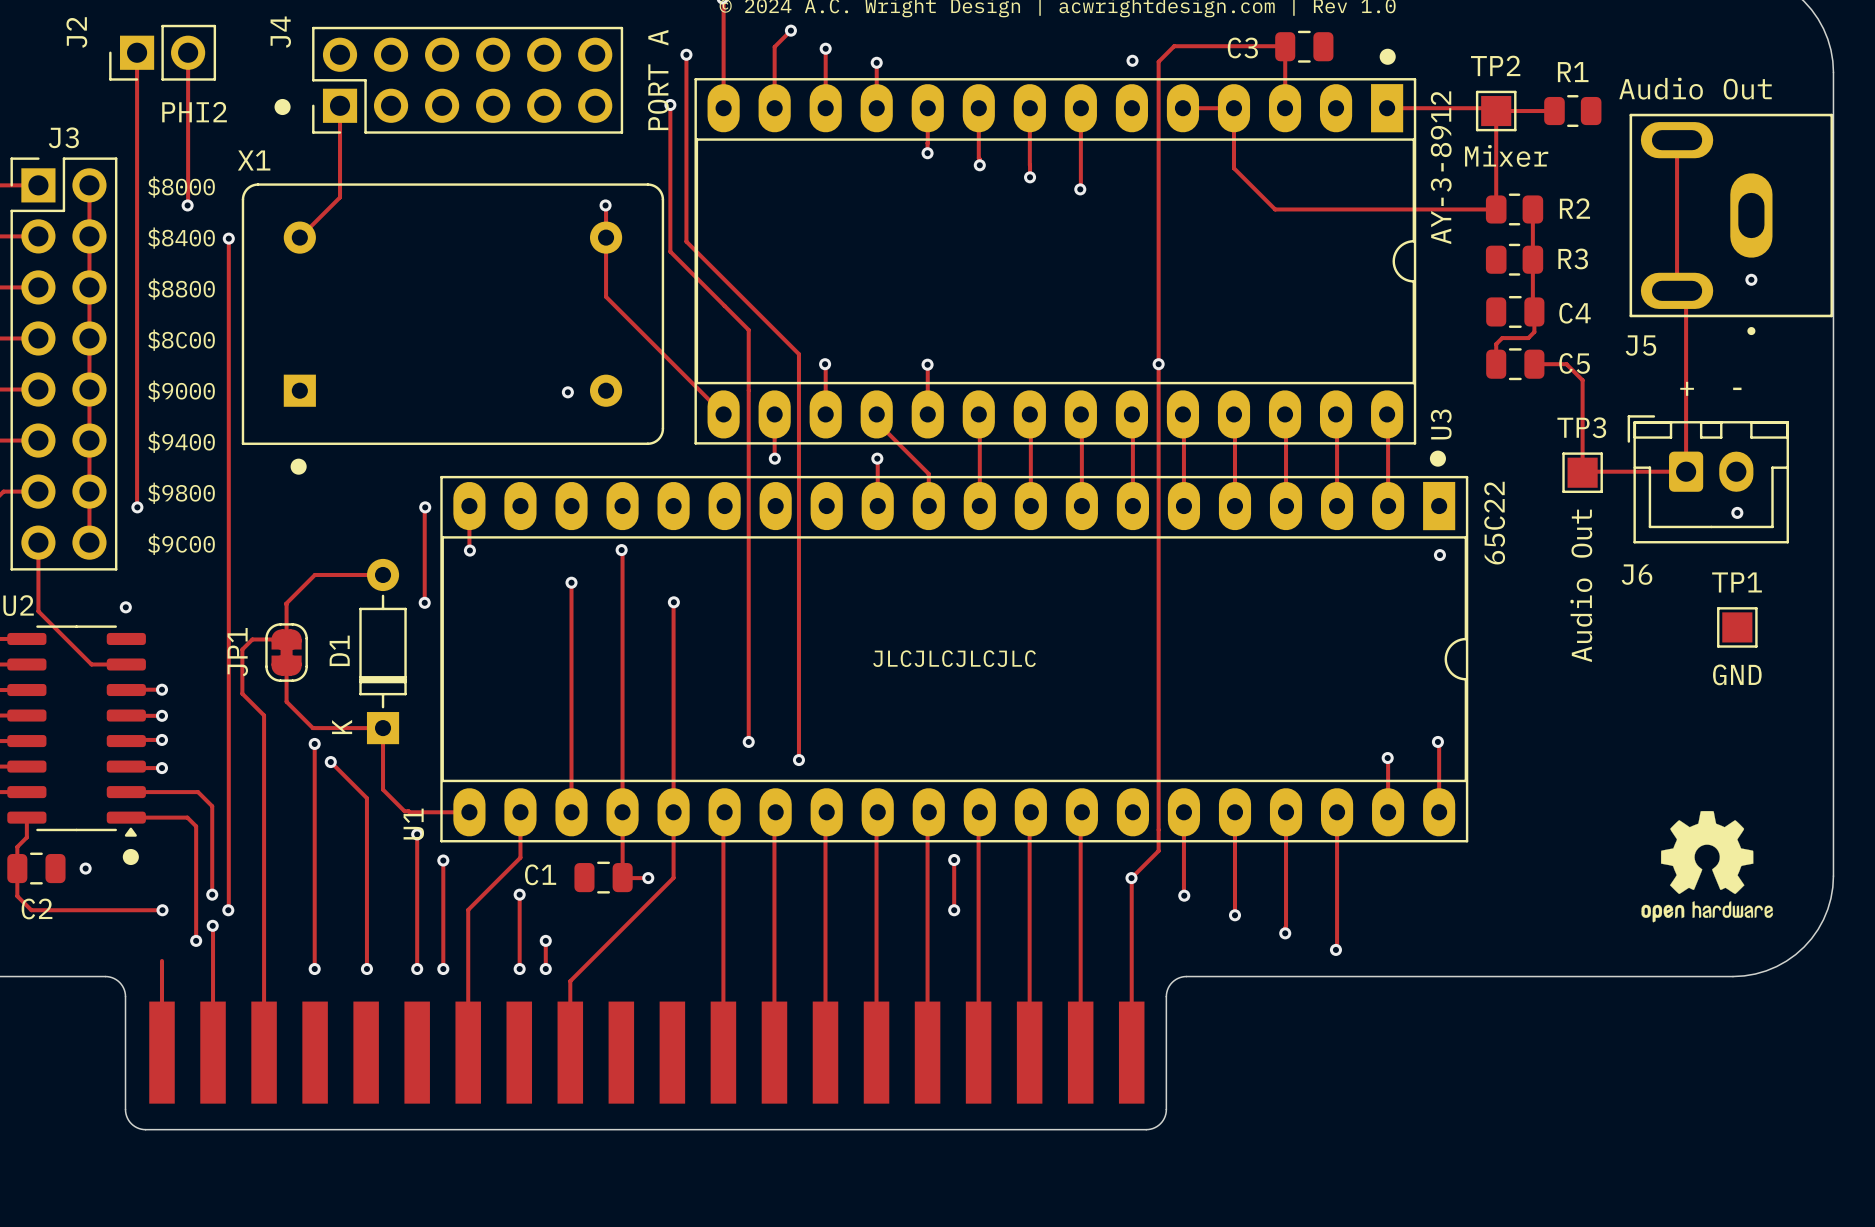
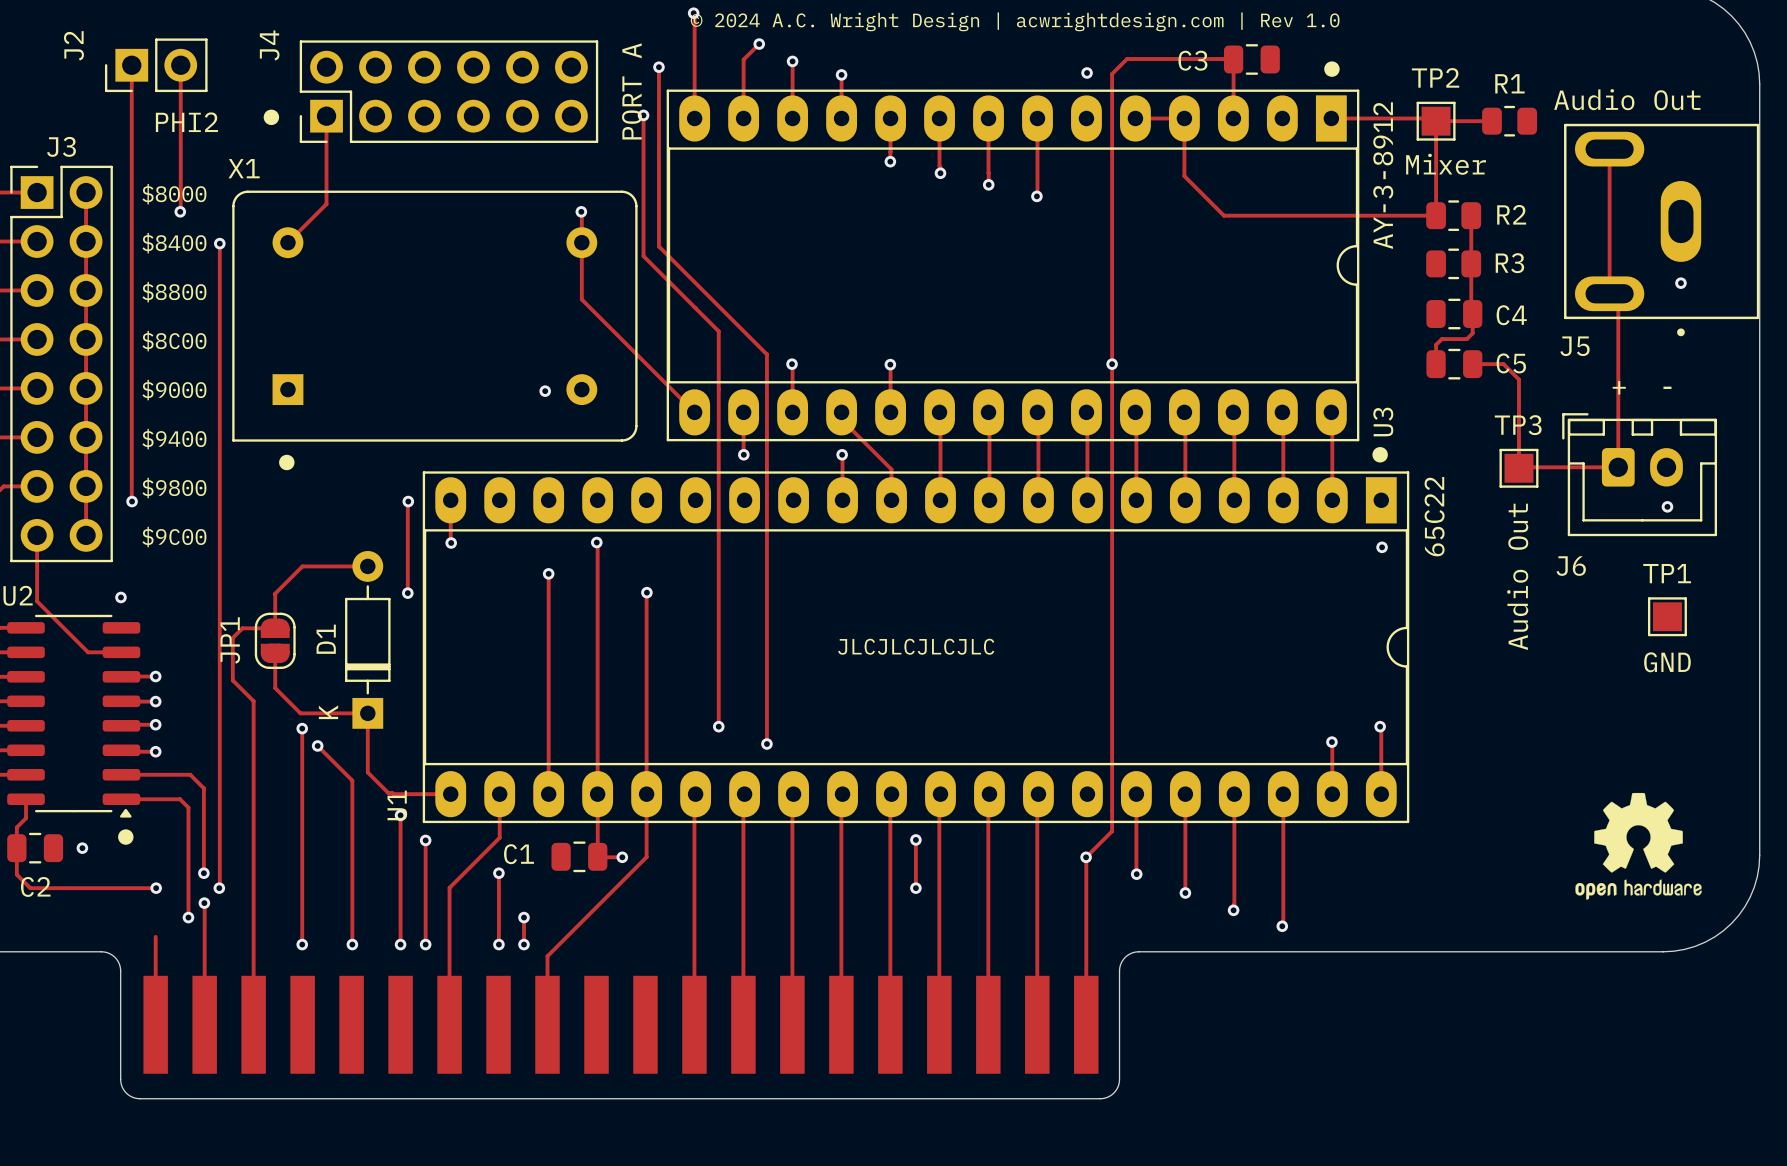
JP1 footprint: [265, 623, 308, 682] -> [254, 612, 296, 670]

